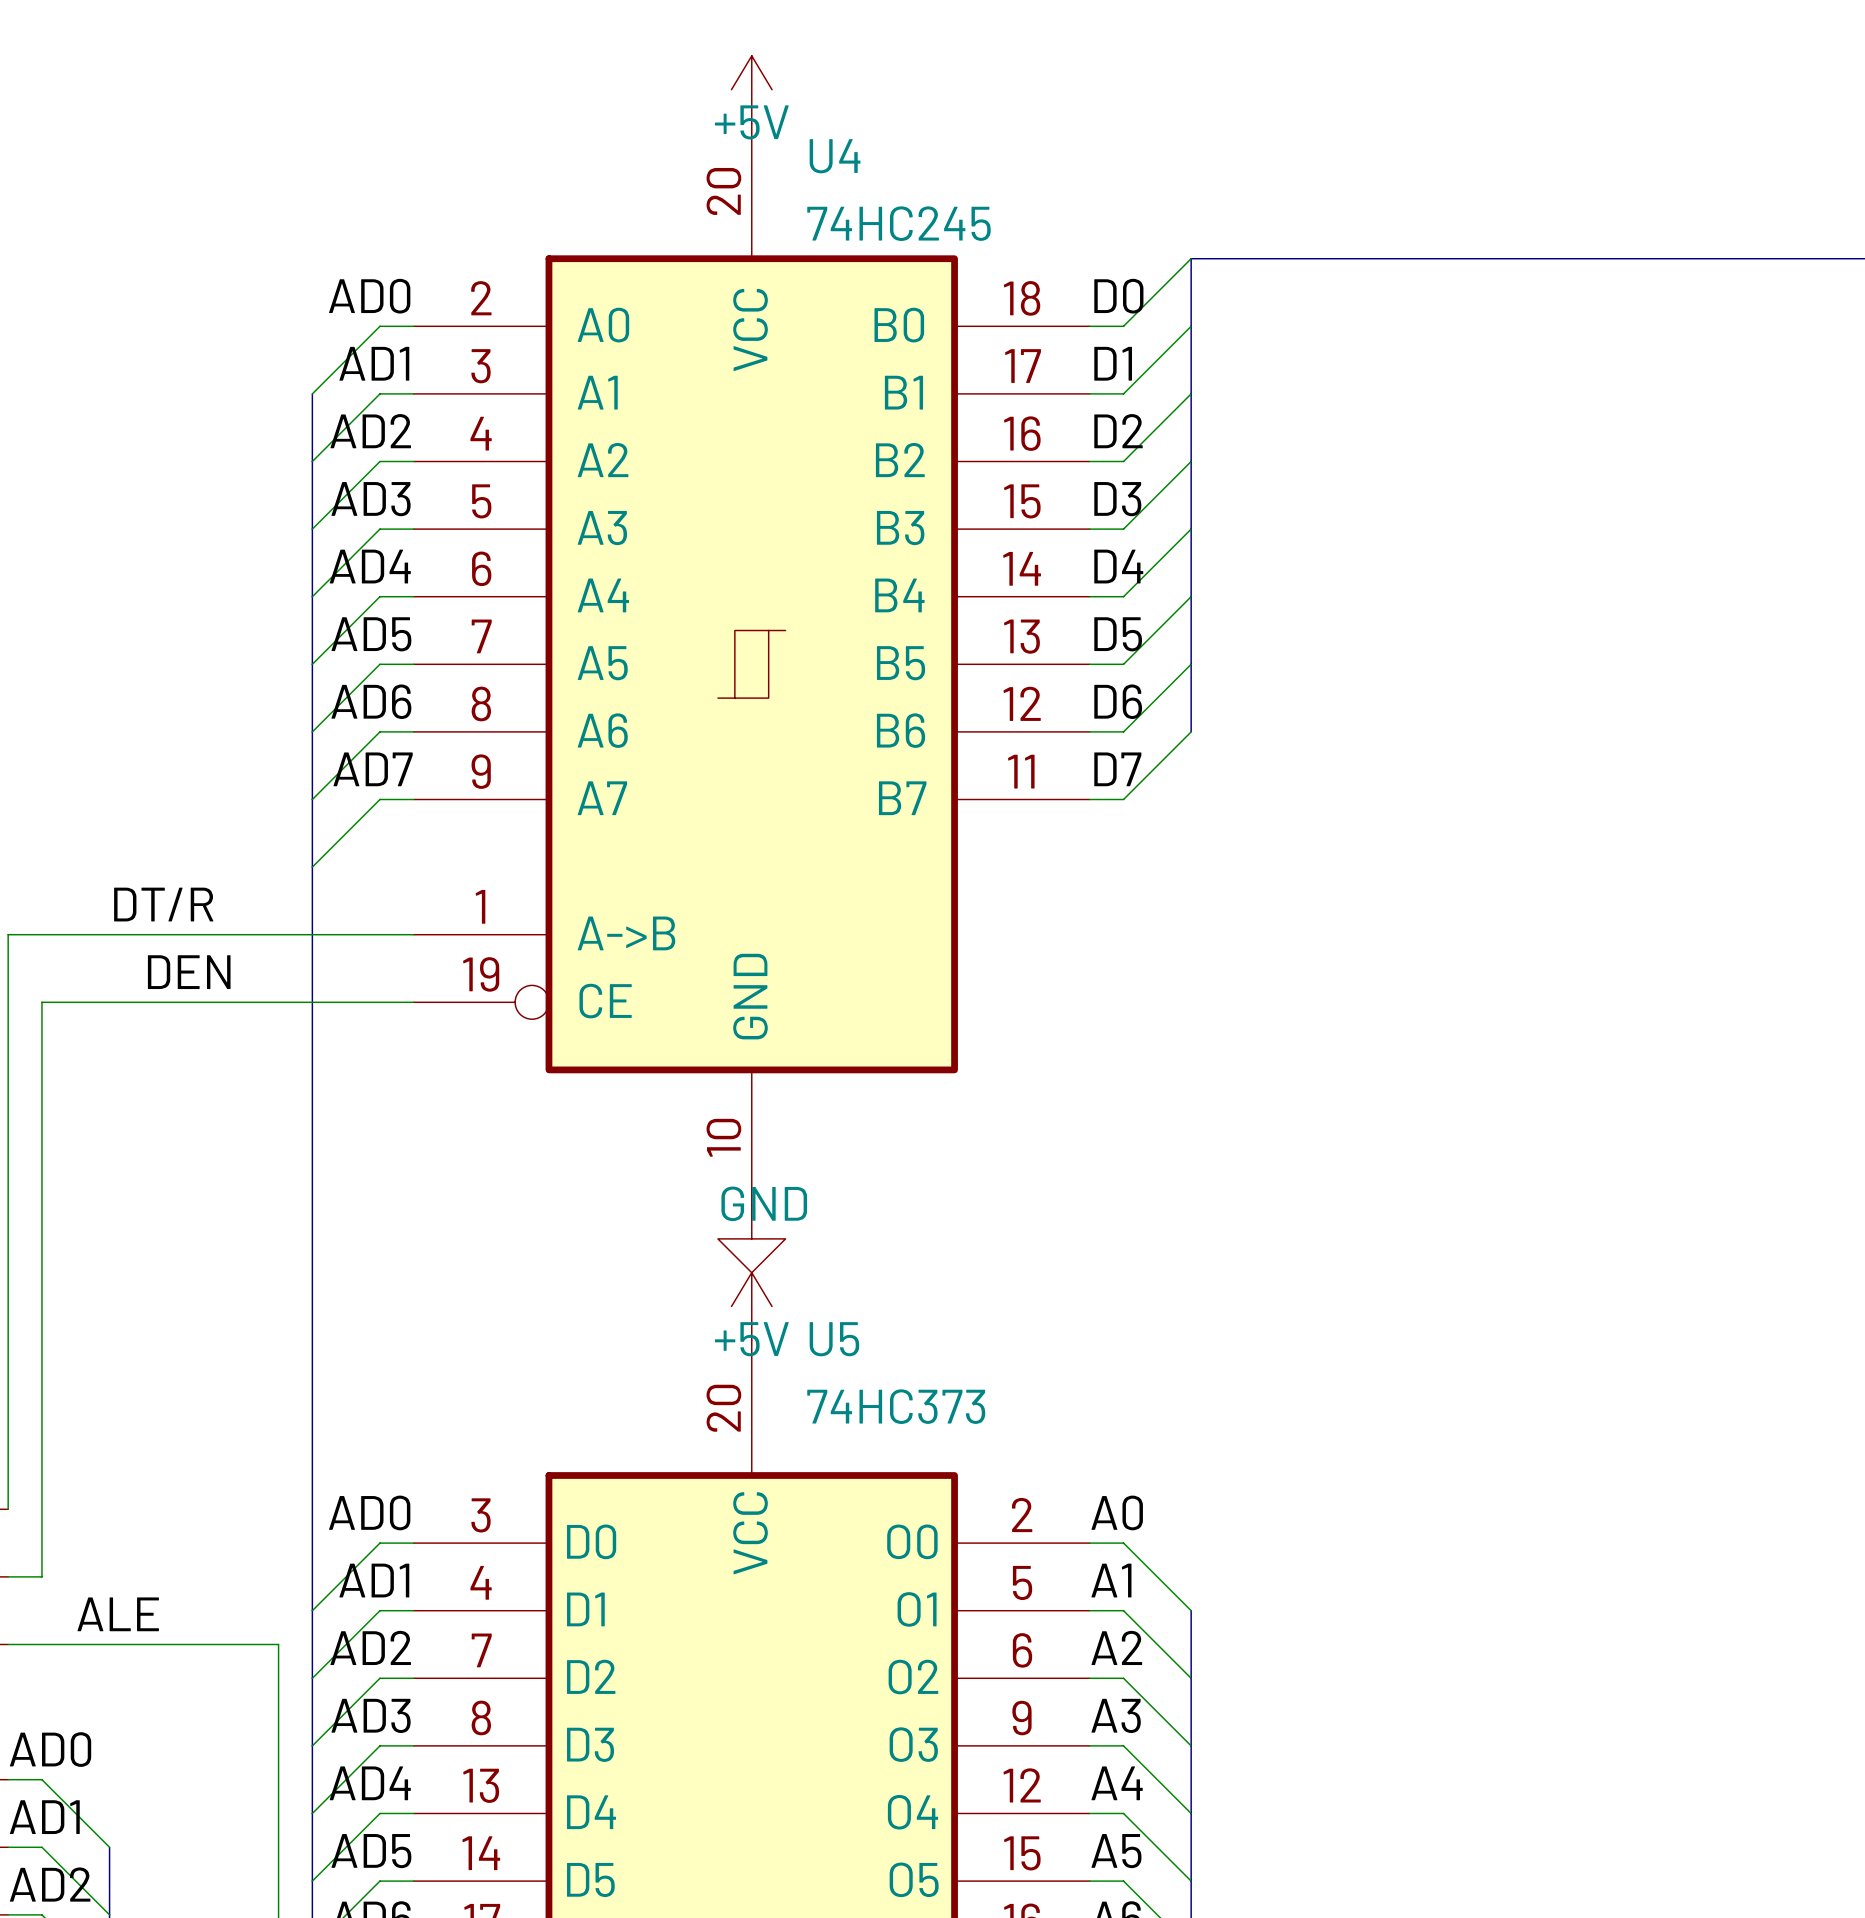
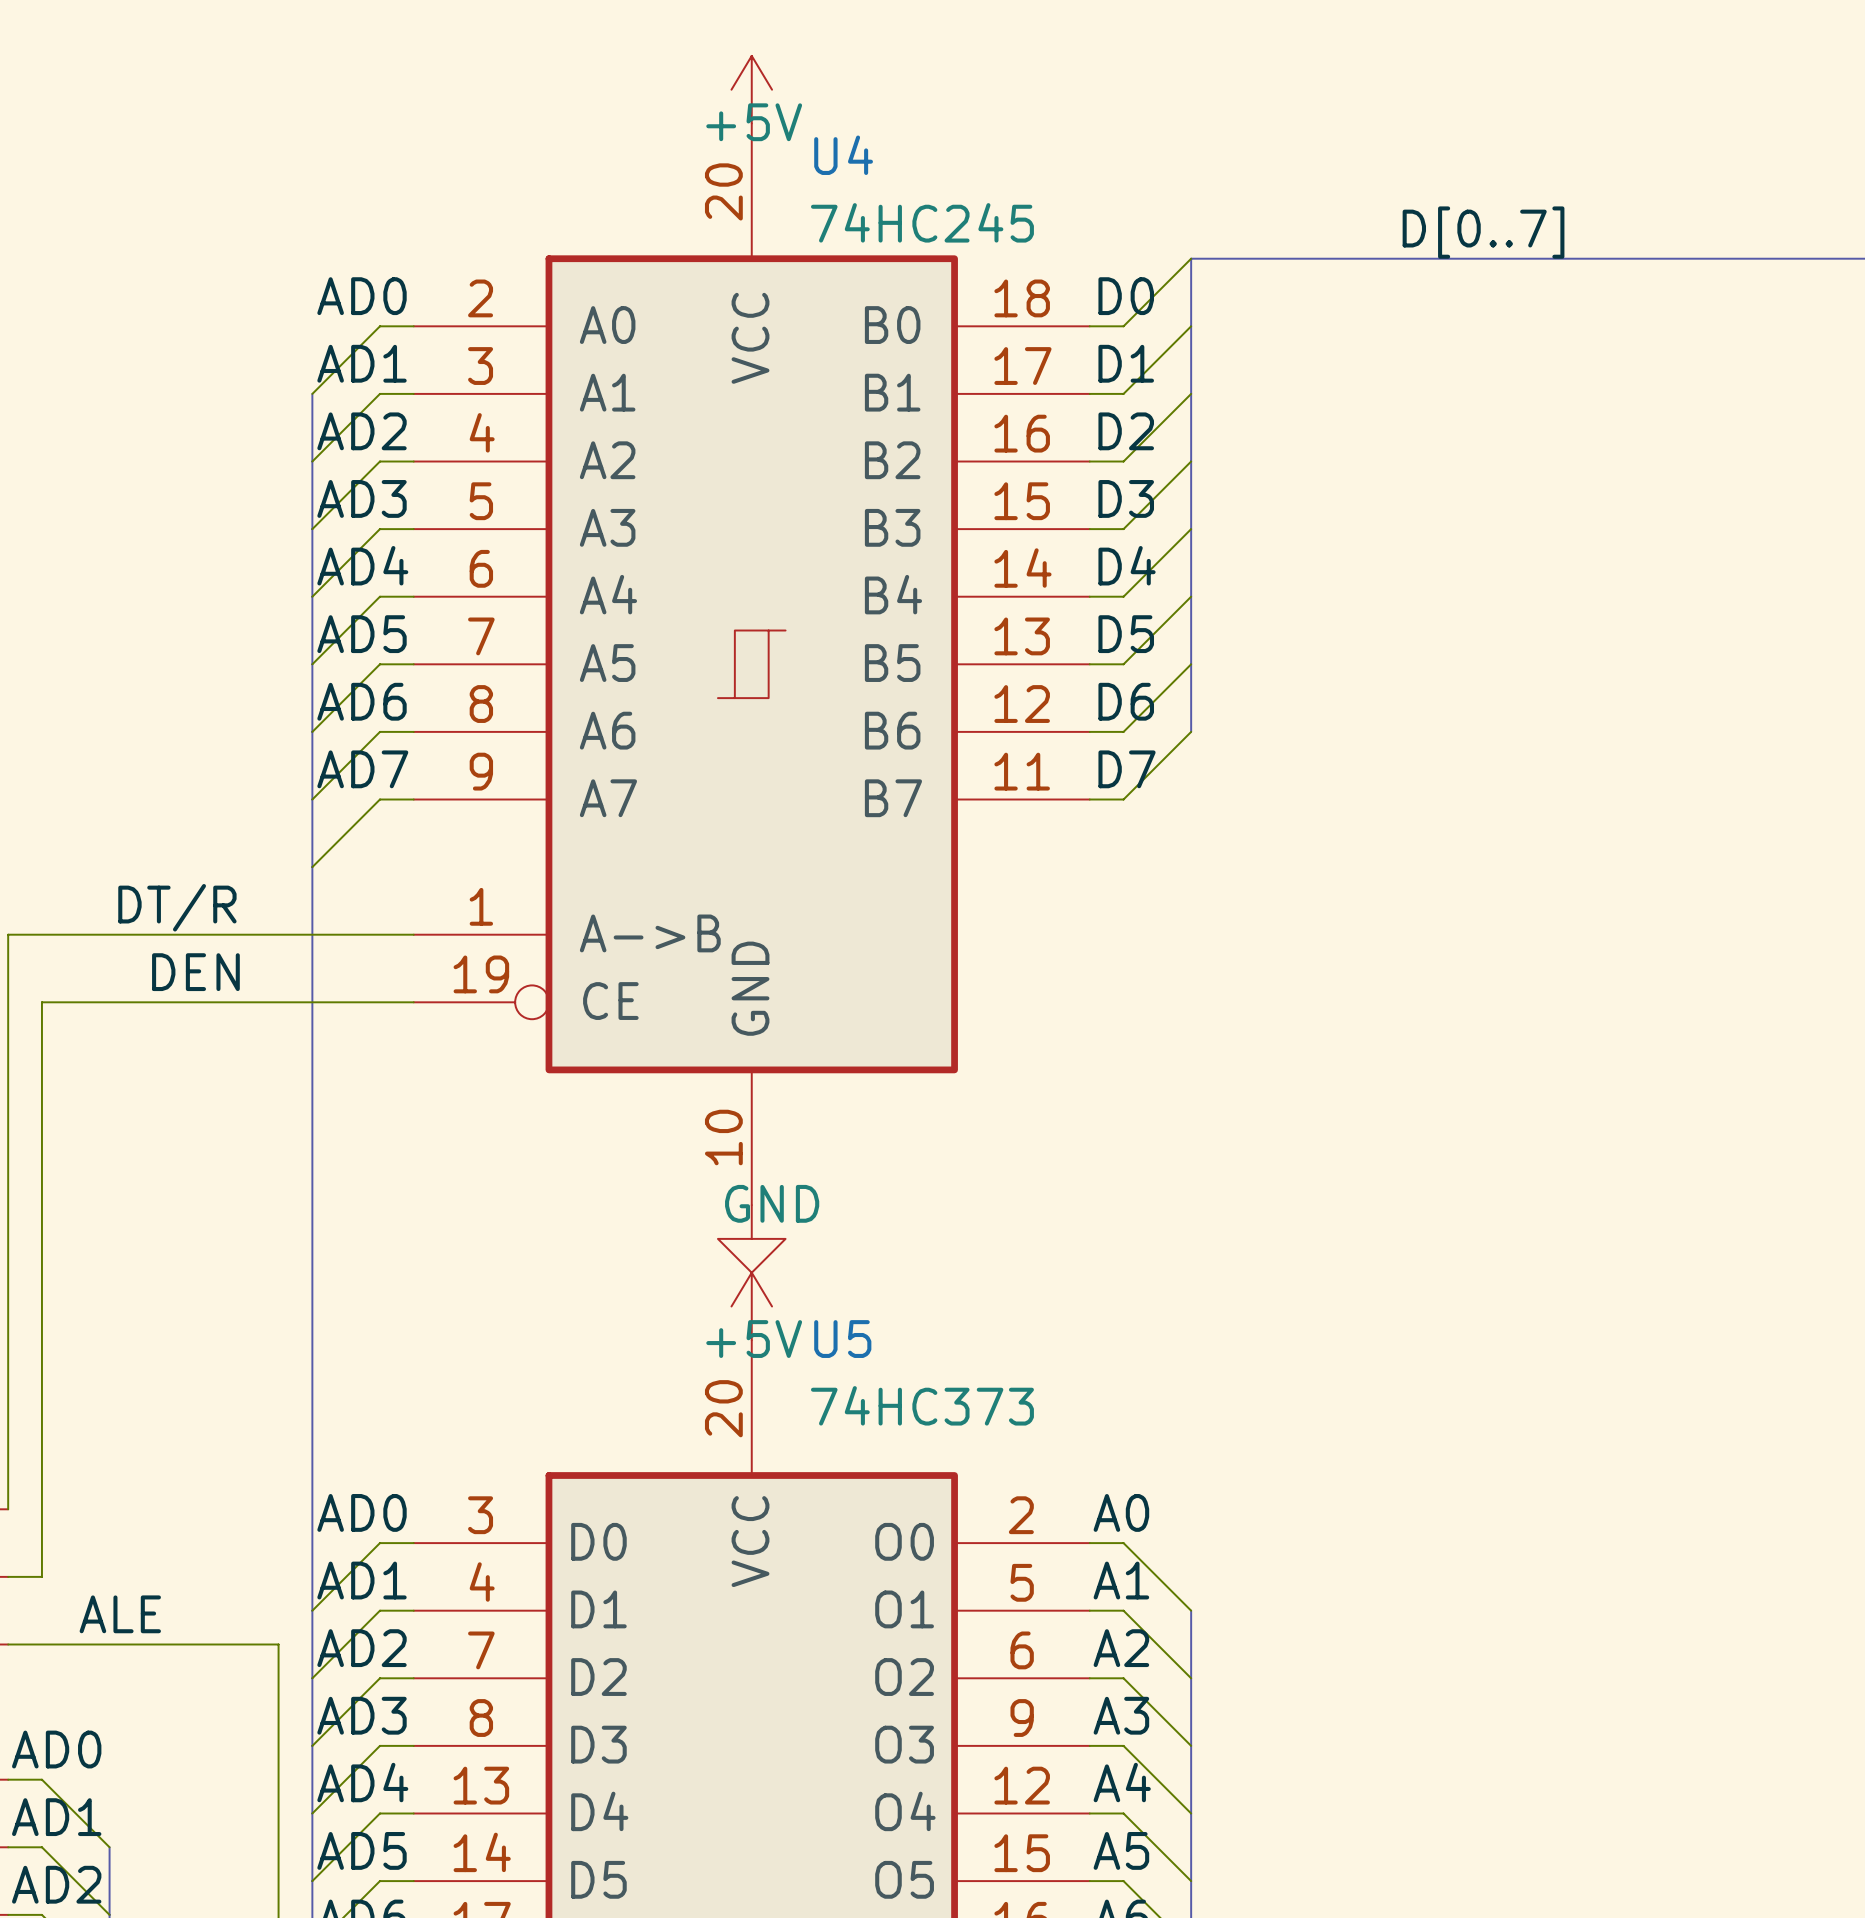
label: none -> D[0..7] (1483, 232)

